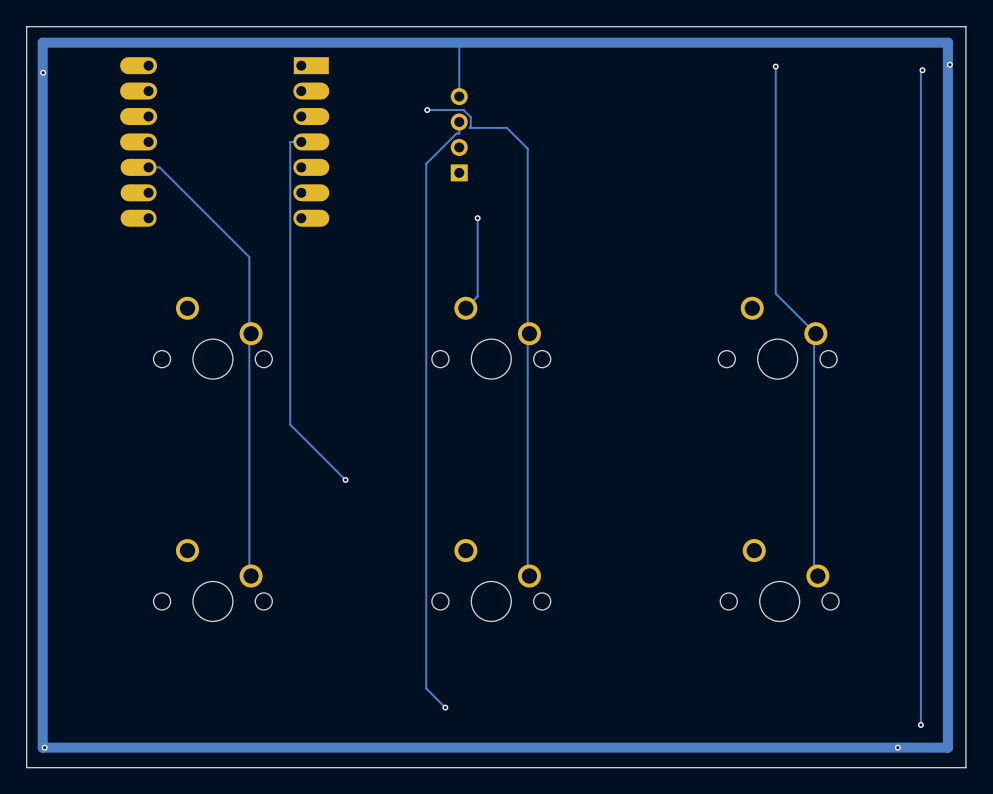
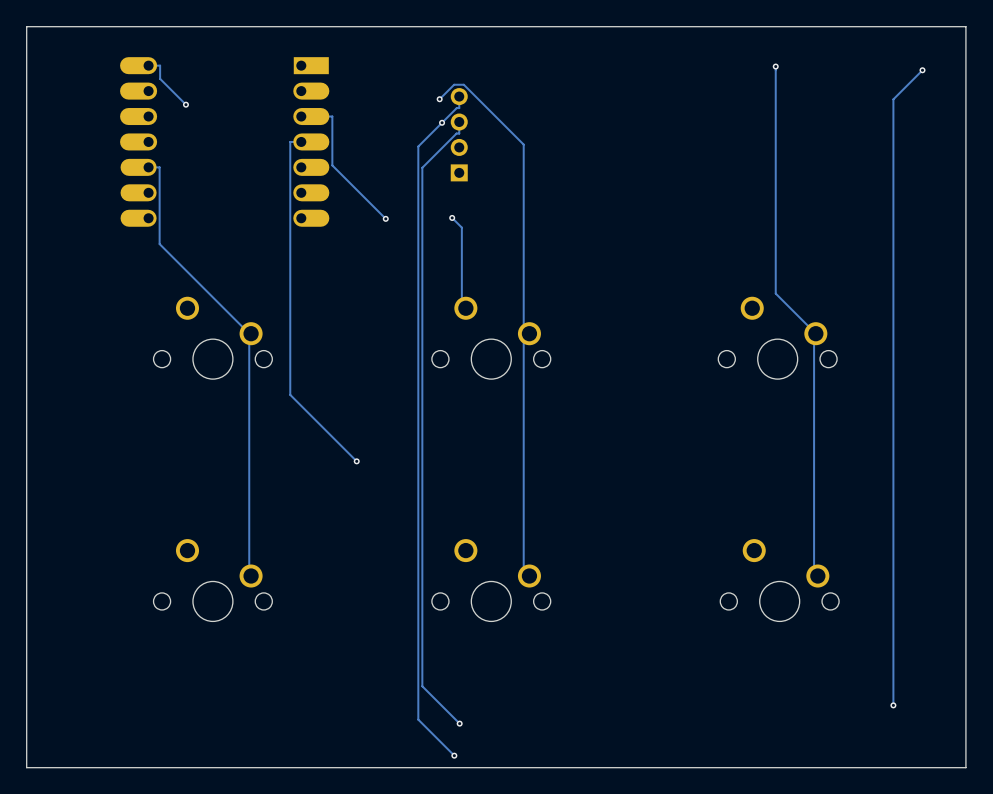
track: (459, 42) (459, 96) -> (454, 755) (418, 719) (418, 146) (456, 108) (459, 108) (459, 96)
track: (947, 42) (42, 42) (42, 747) (947, 747) (947, 42) -> none
via: (949, 64) -> none
track: none -> (148, 65) (160, 65) (160, 78) (185, 104)
track: (920, 71) (920, 724) -> (920, 71) (893, 99) (893, 705)
via: (43, 72) -> none
track: none -> (439, 99) (454, 84) (463, 84) (523, 144) (523, 574) (525, 576)
via: none -> (439, 99)
via: none -> (185, 104)
track: (427, 110) (463, 110) (470, 117) (469, 127) (506, 127) (527, 148) (527, 574) (529, 576) -> none
via: (427, 110) -> none
track: none -> (301, 116) (332, 116) (332, 165) (385, 218)
via: none -> (442, 122)
track: (456, 133) (426, 163) (426, 688) (445, 707) -> (456, 133) (422, 167) (422, 686) (459, 723)
track: (159, 167) (249, 257) (249, 574) (251, 576) -> (159, 167) (159, 244) (249, 333) (249, 574) (251, 576)
track: none -> (452, 217) (461, 227) (461, 308)
via: none -> (385, 218)
track: (477, 218) (477, 296) (465, 308) -> none
via position: (477, 218) -> (452, 217)
track: (290, 394) (290, 424) (345, 479) -> (290, 394) (356, 461)
via position: (345, 479) -> (356, 461)
via: none -> (893, 705)
via position: (445, 707) -> (459, 723)
via: (920, 724) -> none
via: (44, 747) -> none
via: (897, 747) -> none
via: none -> (454, 755)

